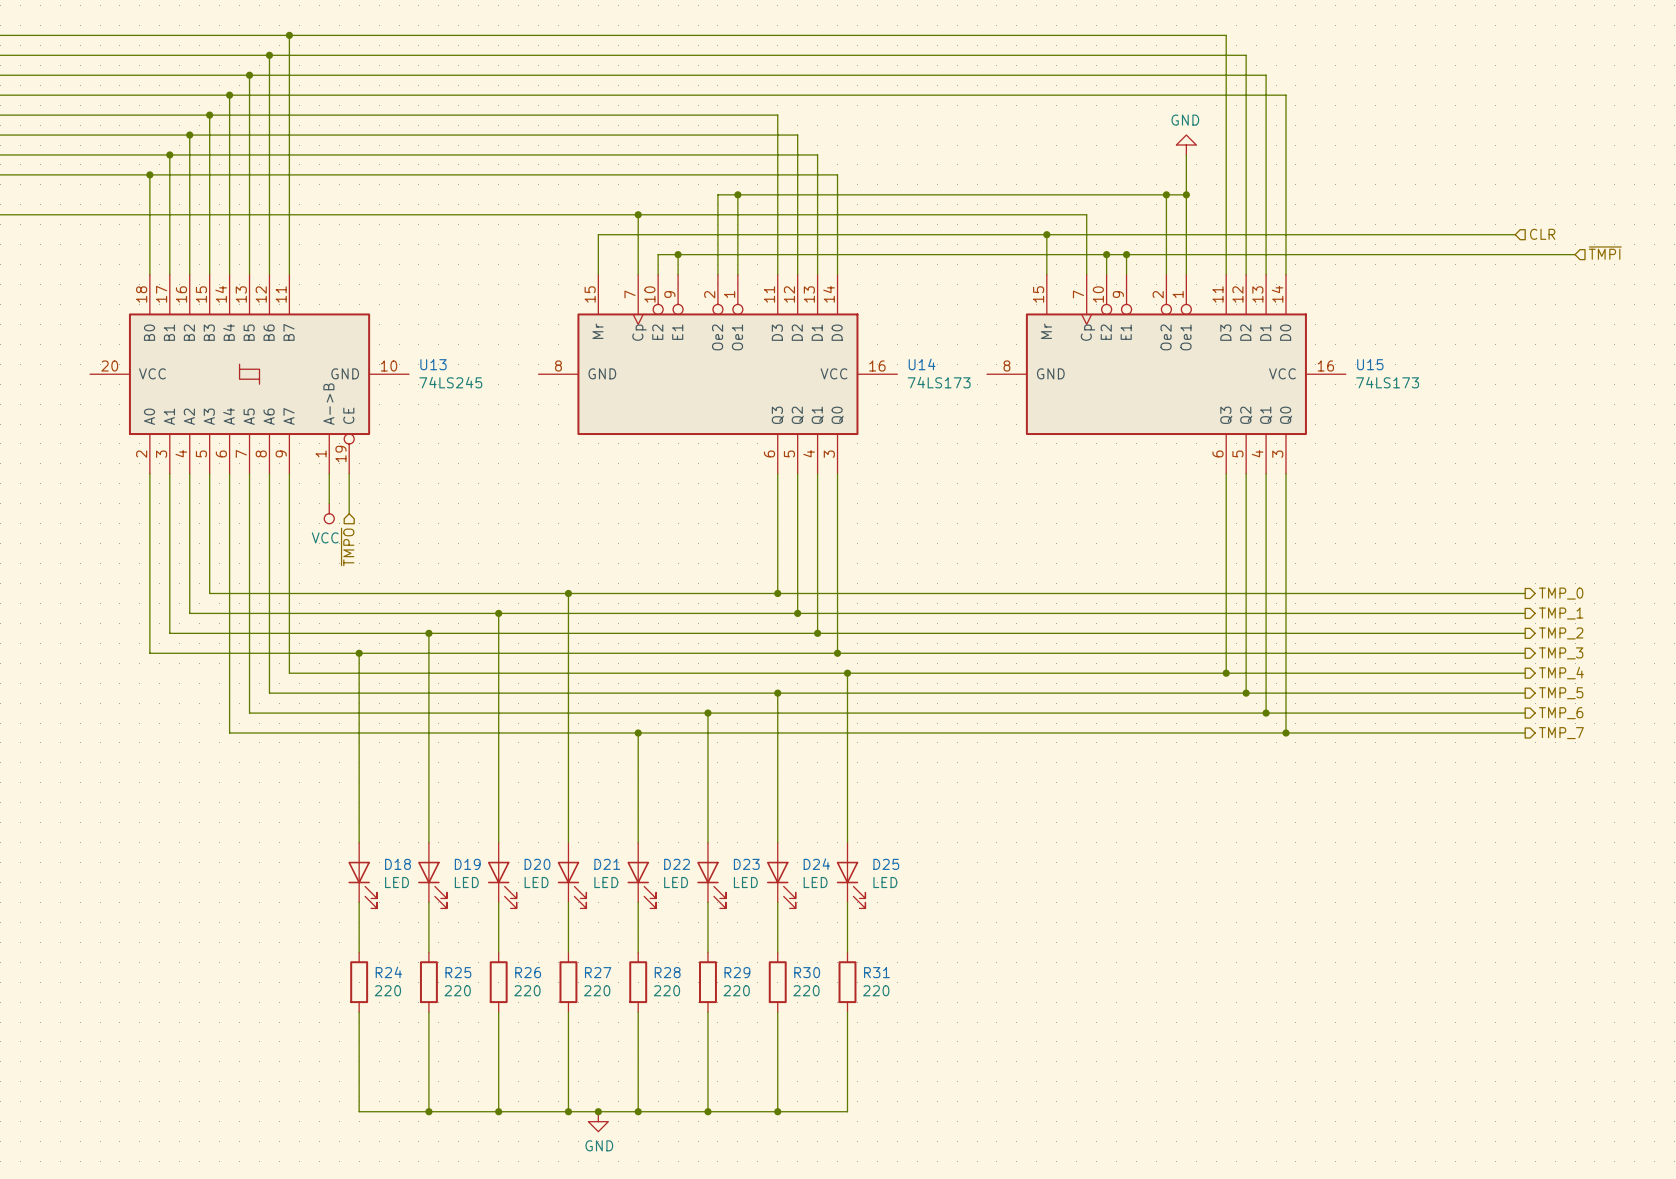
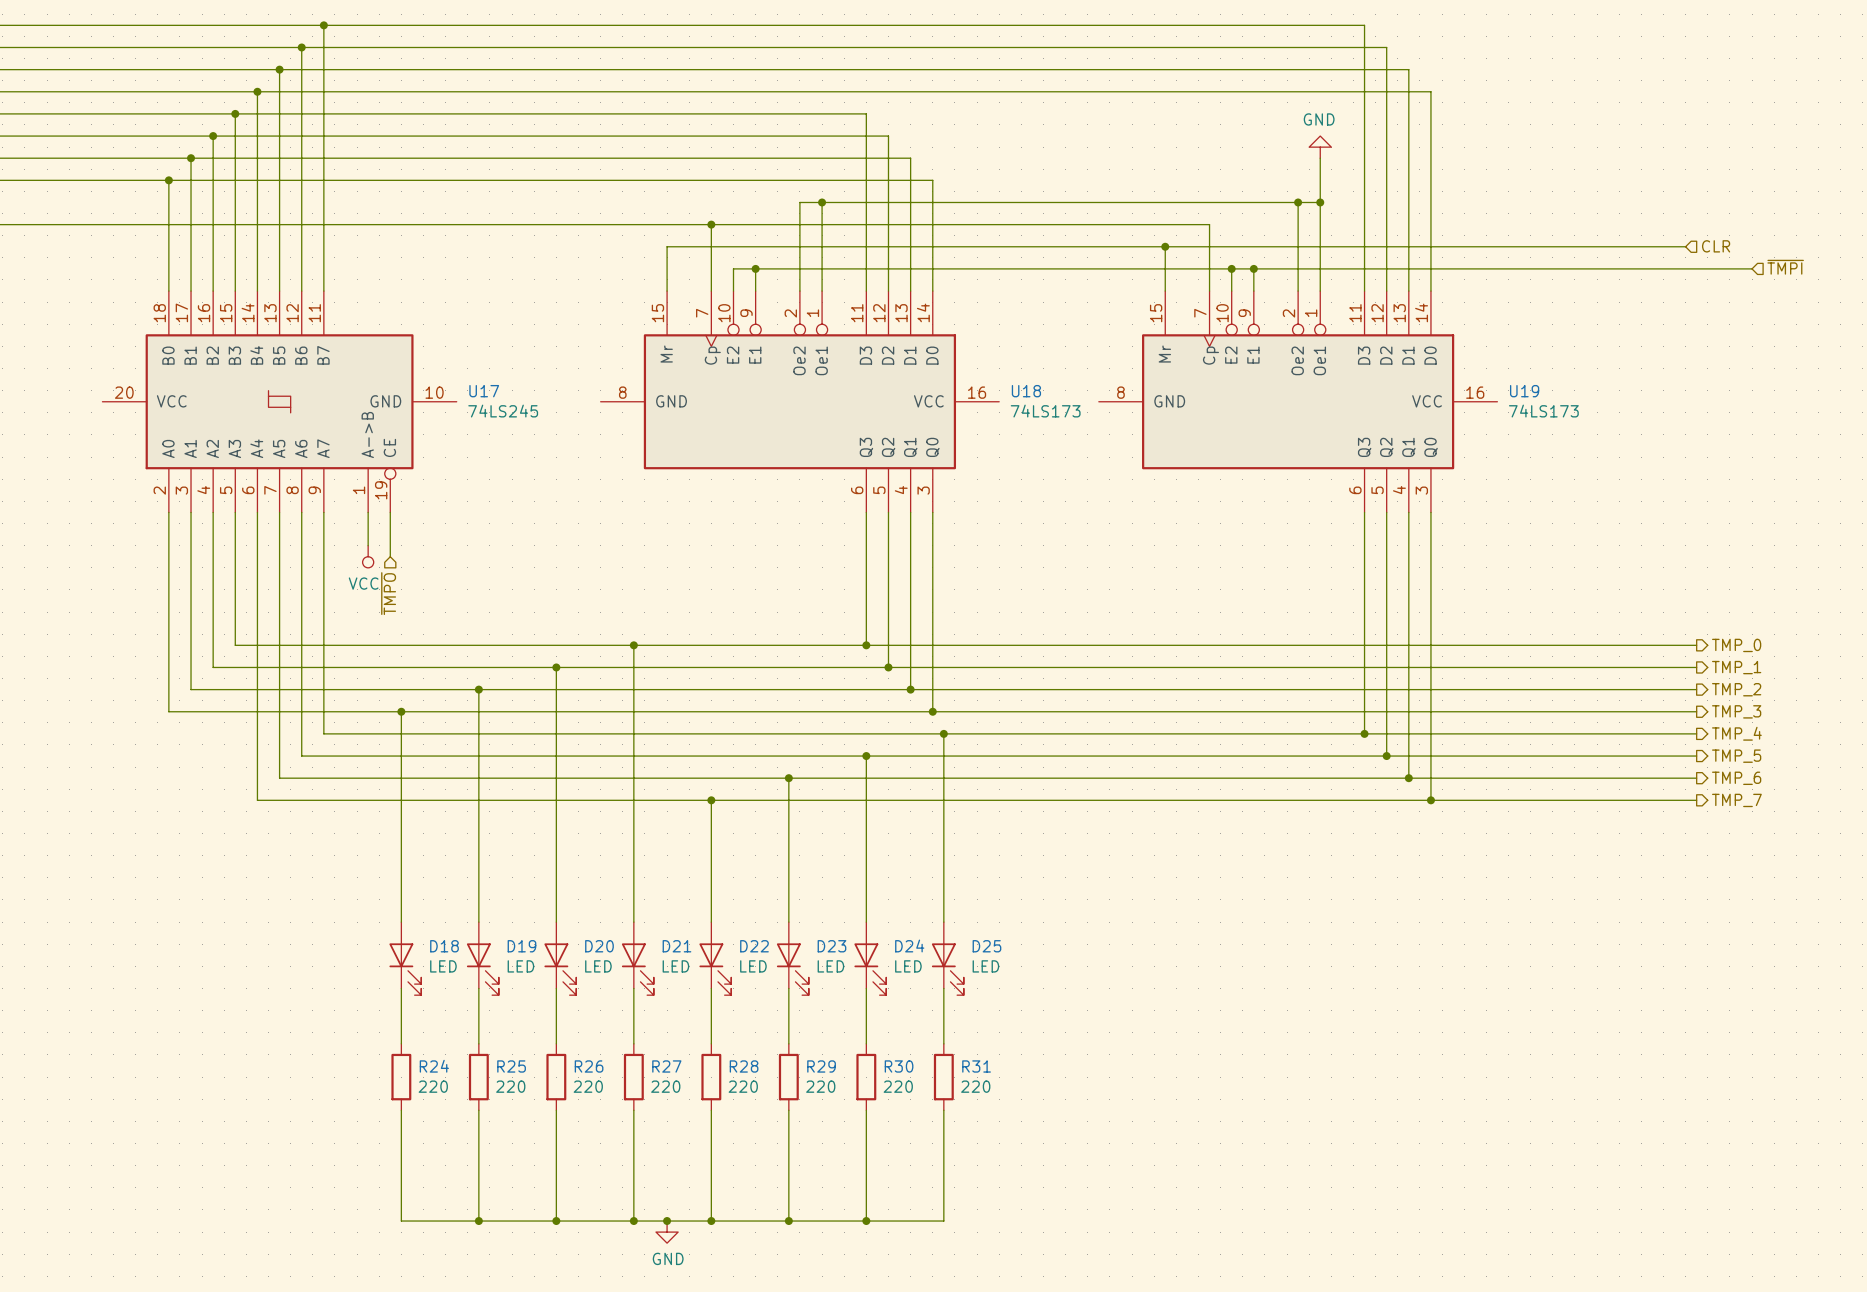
U13 name: U13 (433, 364) -> U17 (484, 391)
U14 name: U14 (922, 364) -> U18 (1026, 391)
U15 name: U15 (1370, 364) -> U19 (1524, 391)

